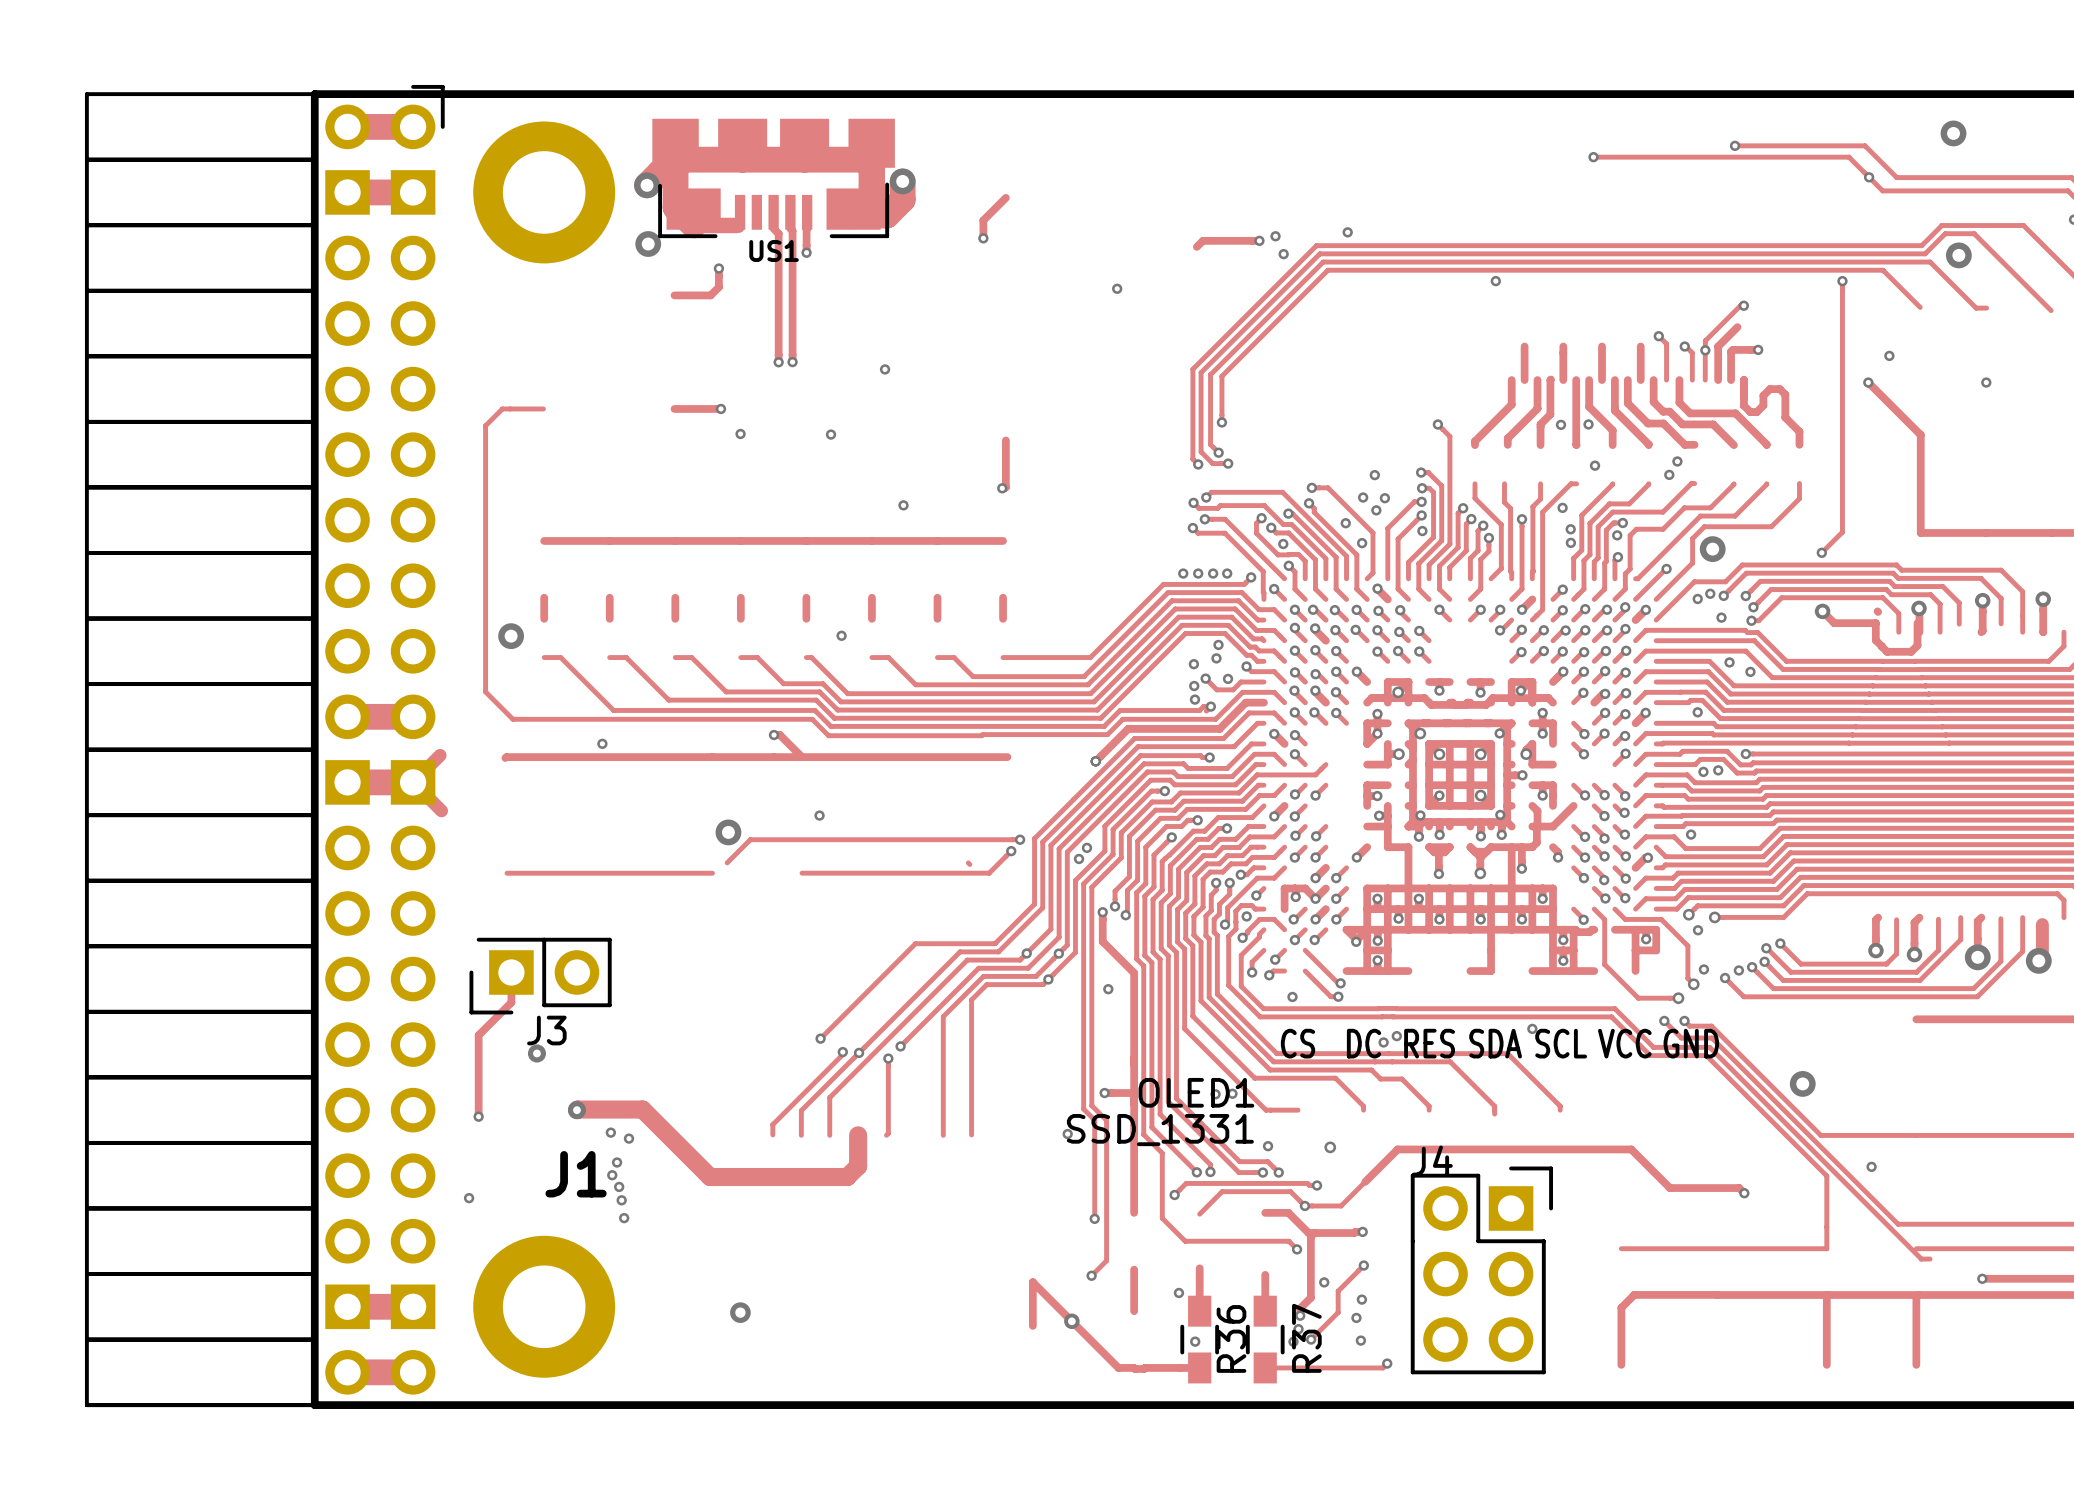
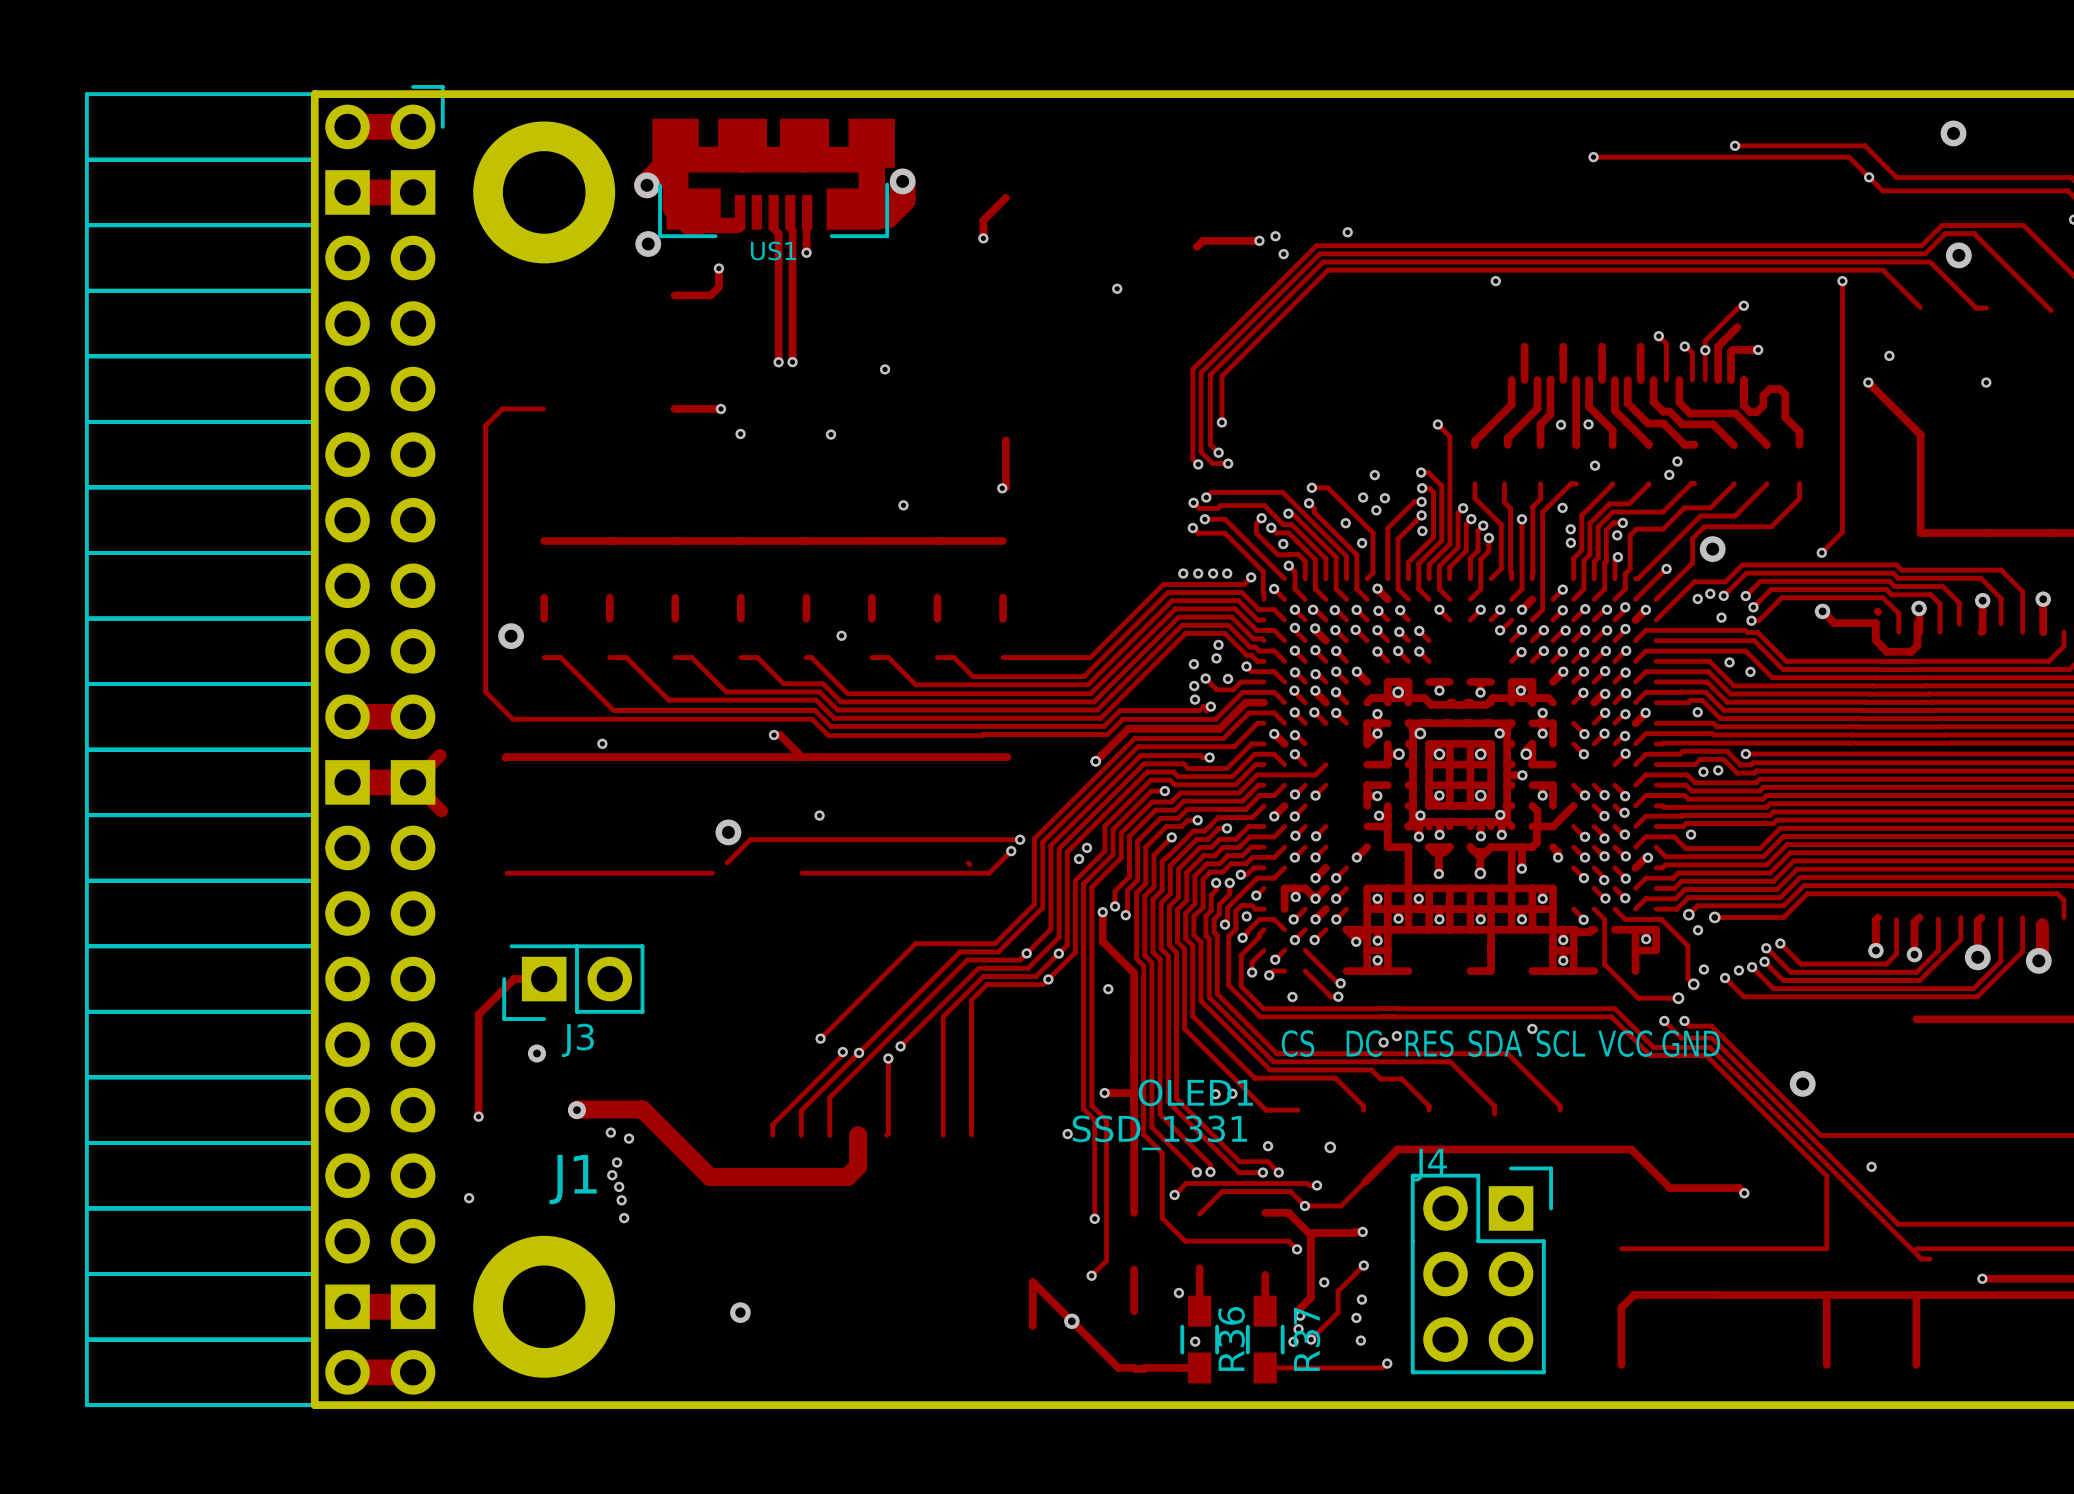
track: (511, 972) (511, 1002) (478, 1035) -> (544, 979) (514, 979) (478, 1014) (478, 1035)
J3 position: (540, 976) -> (573, 982)

